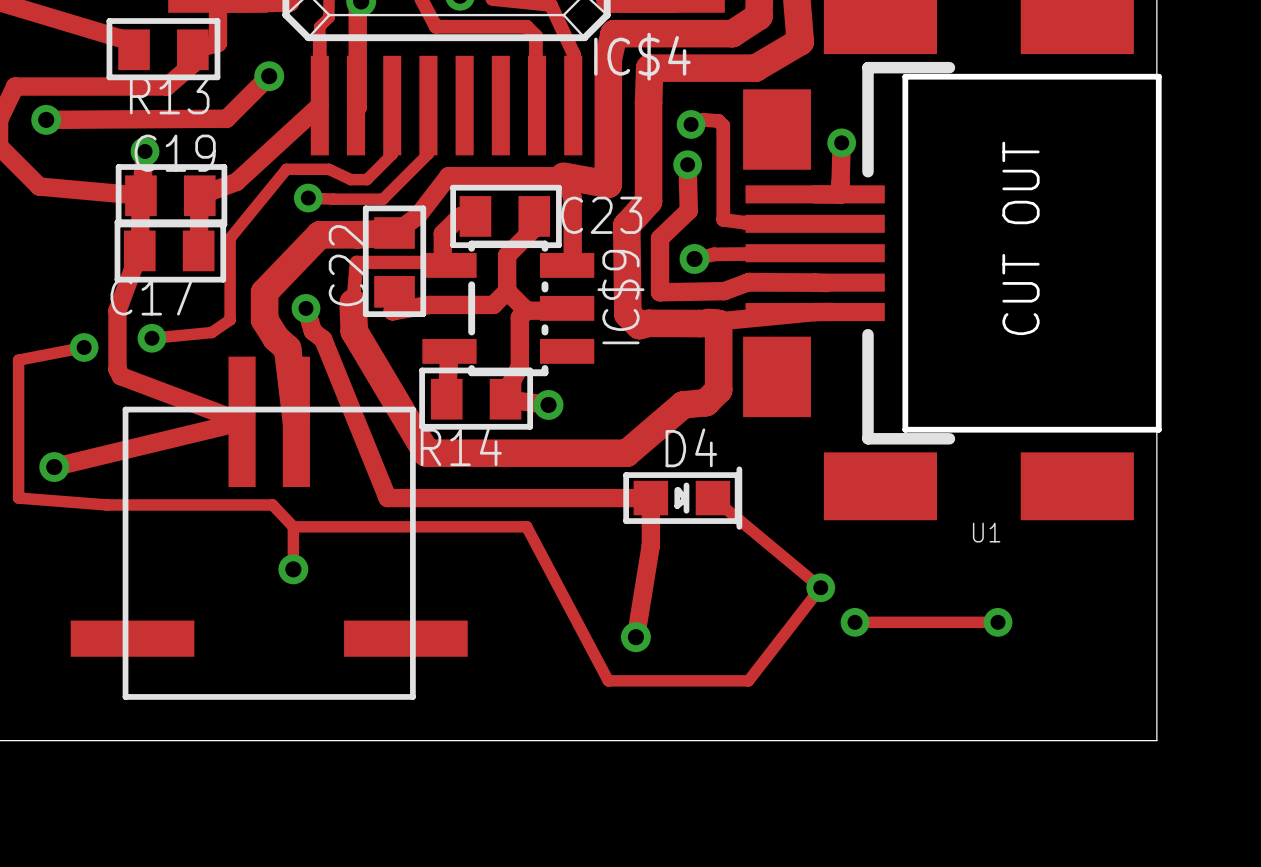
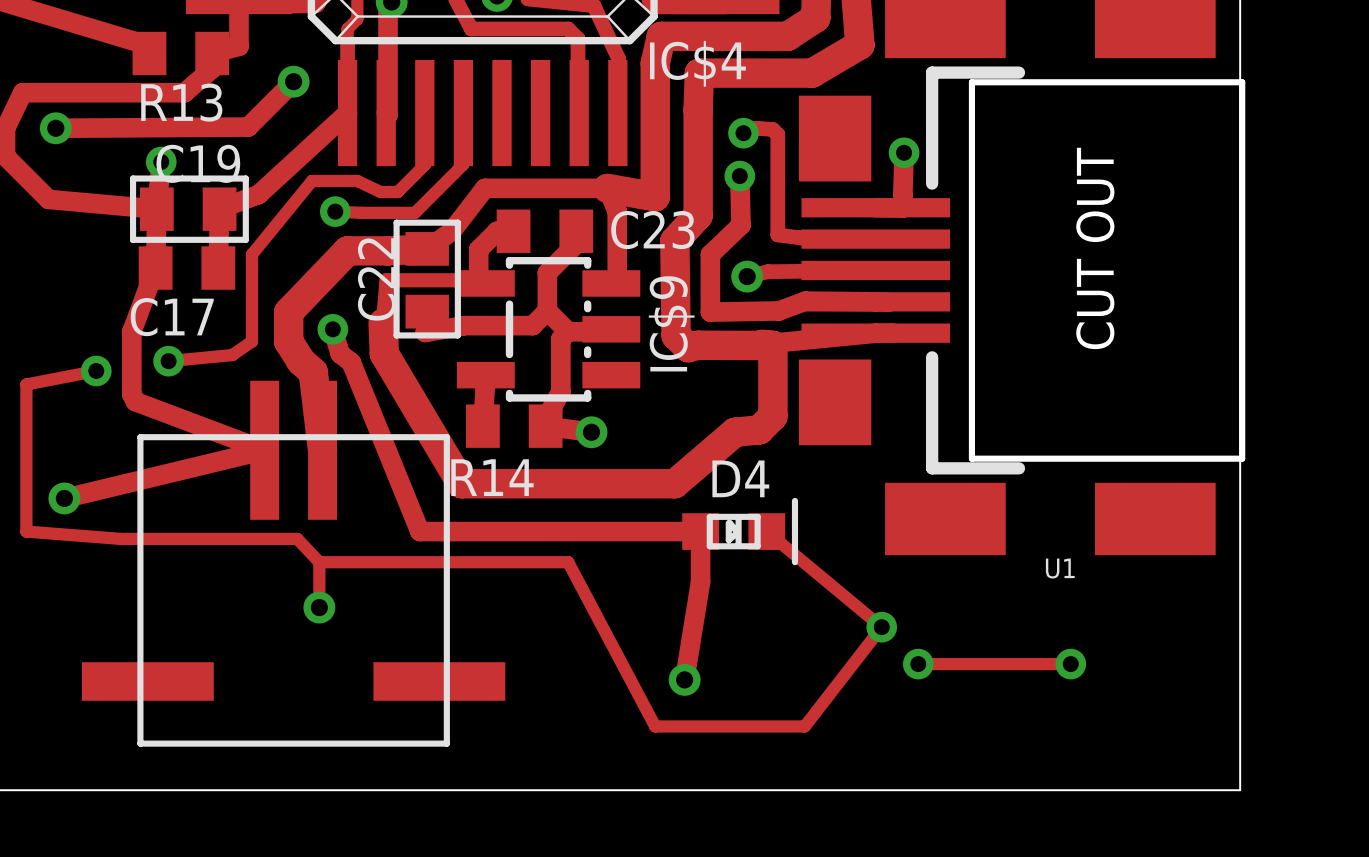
R13 footprint: [106, 18, 221, 81] -> [132, 31, 230, 76]
C23 footprint: [450, 184, 562, 249] -> [496, 209, 594, 253]
C17 footprint: [114, 219, 227, 283] -> [138, 246, 236, 290]
R14 footprint: [419, 367, 534, 430] -> [466, 404, 563, 448]
D4 footprint: [623, 466, 743, 530] -> [682, 497, 799, 566]

